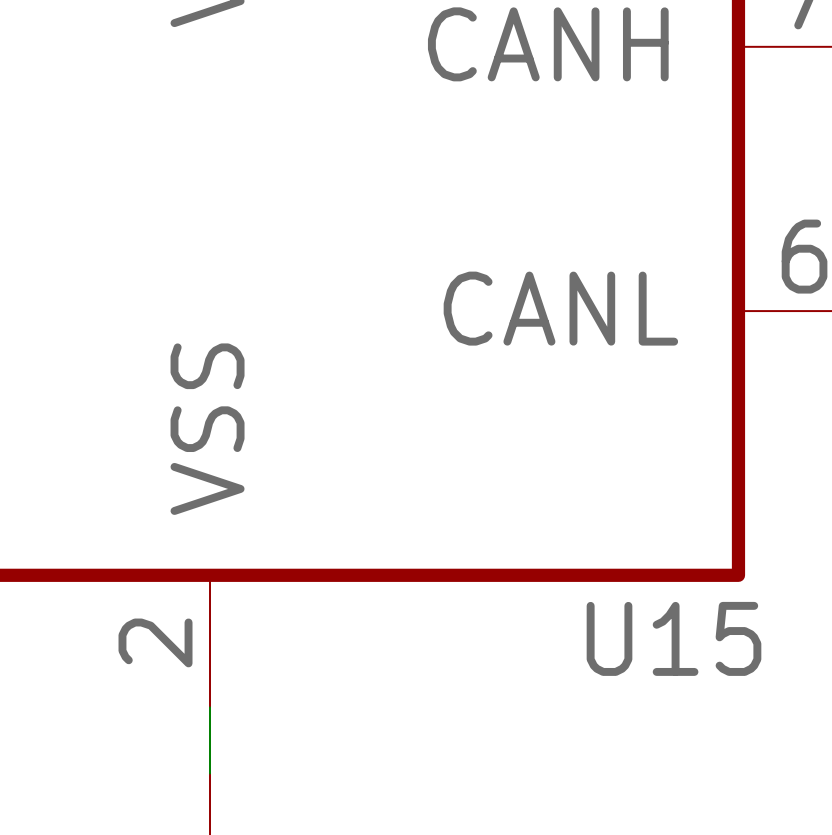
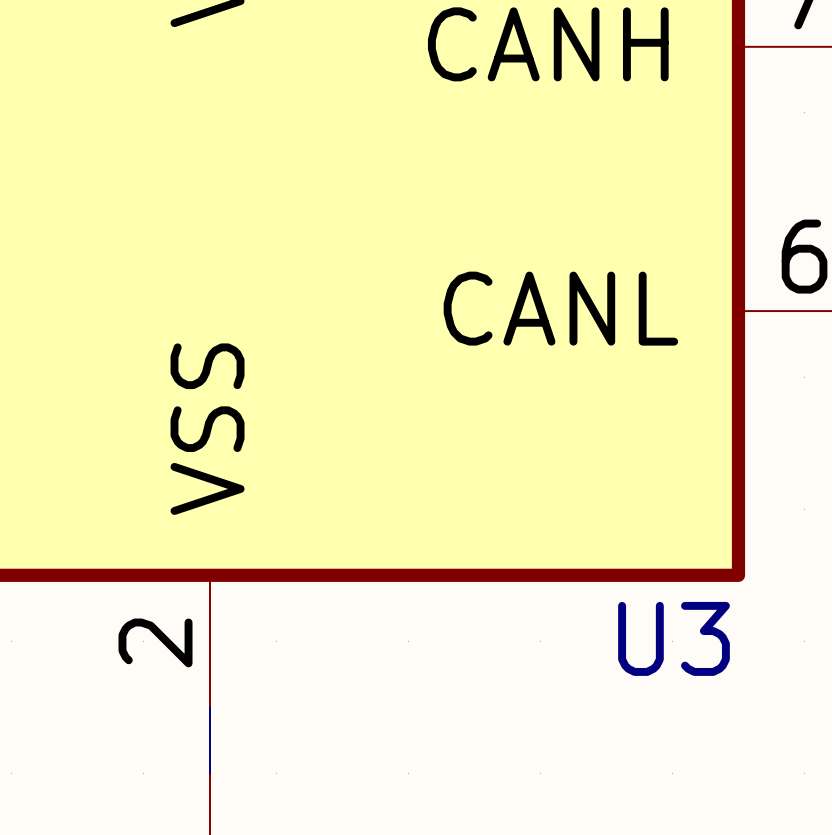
U15 name: U15 (673, 638) -> U3 (673, 638)

